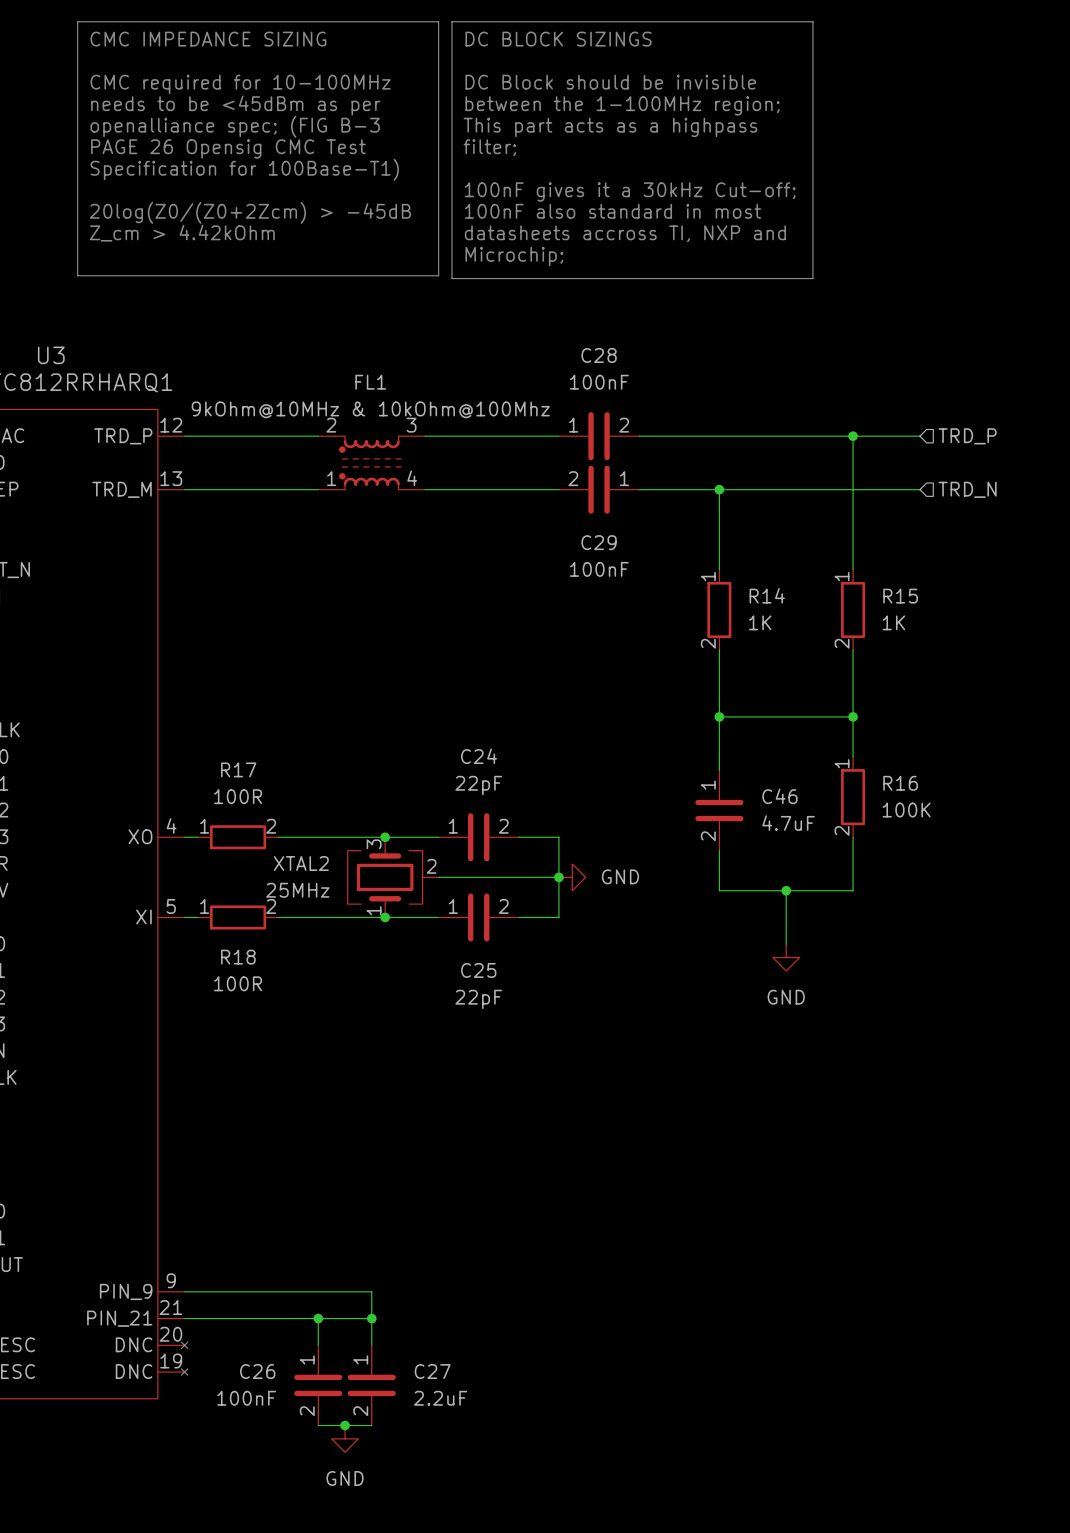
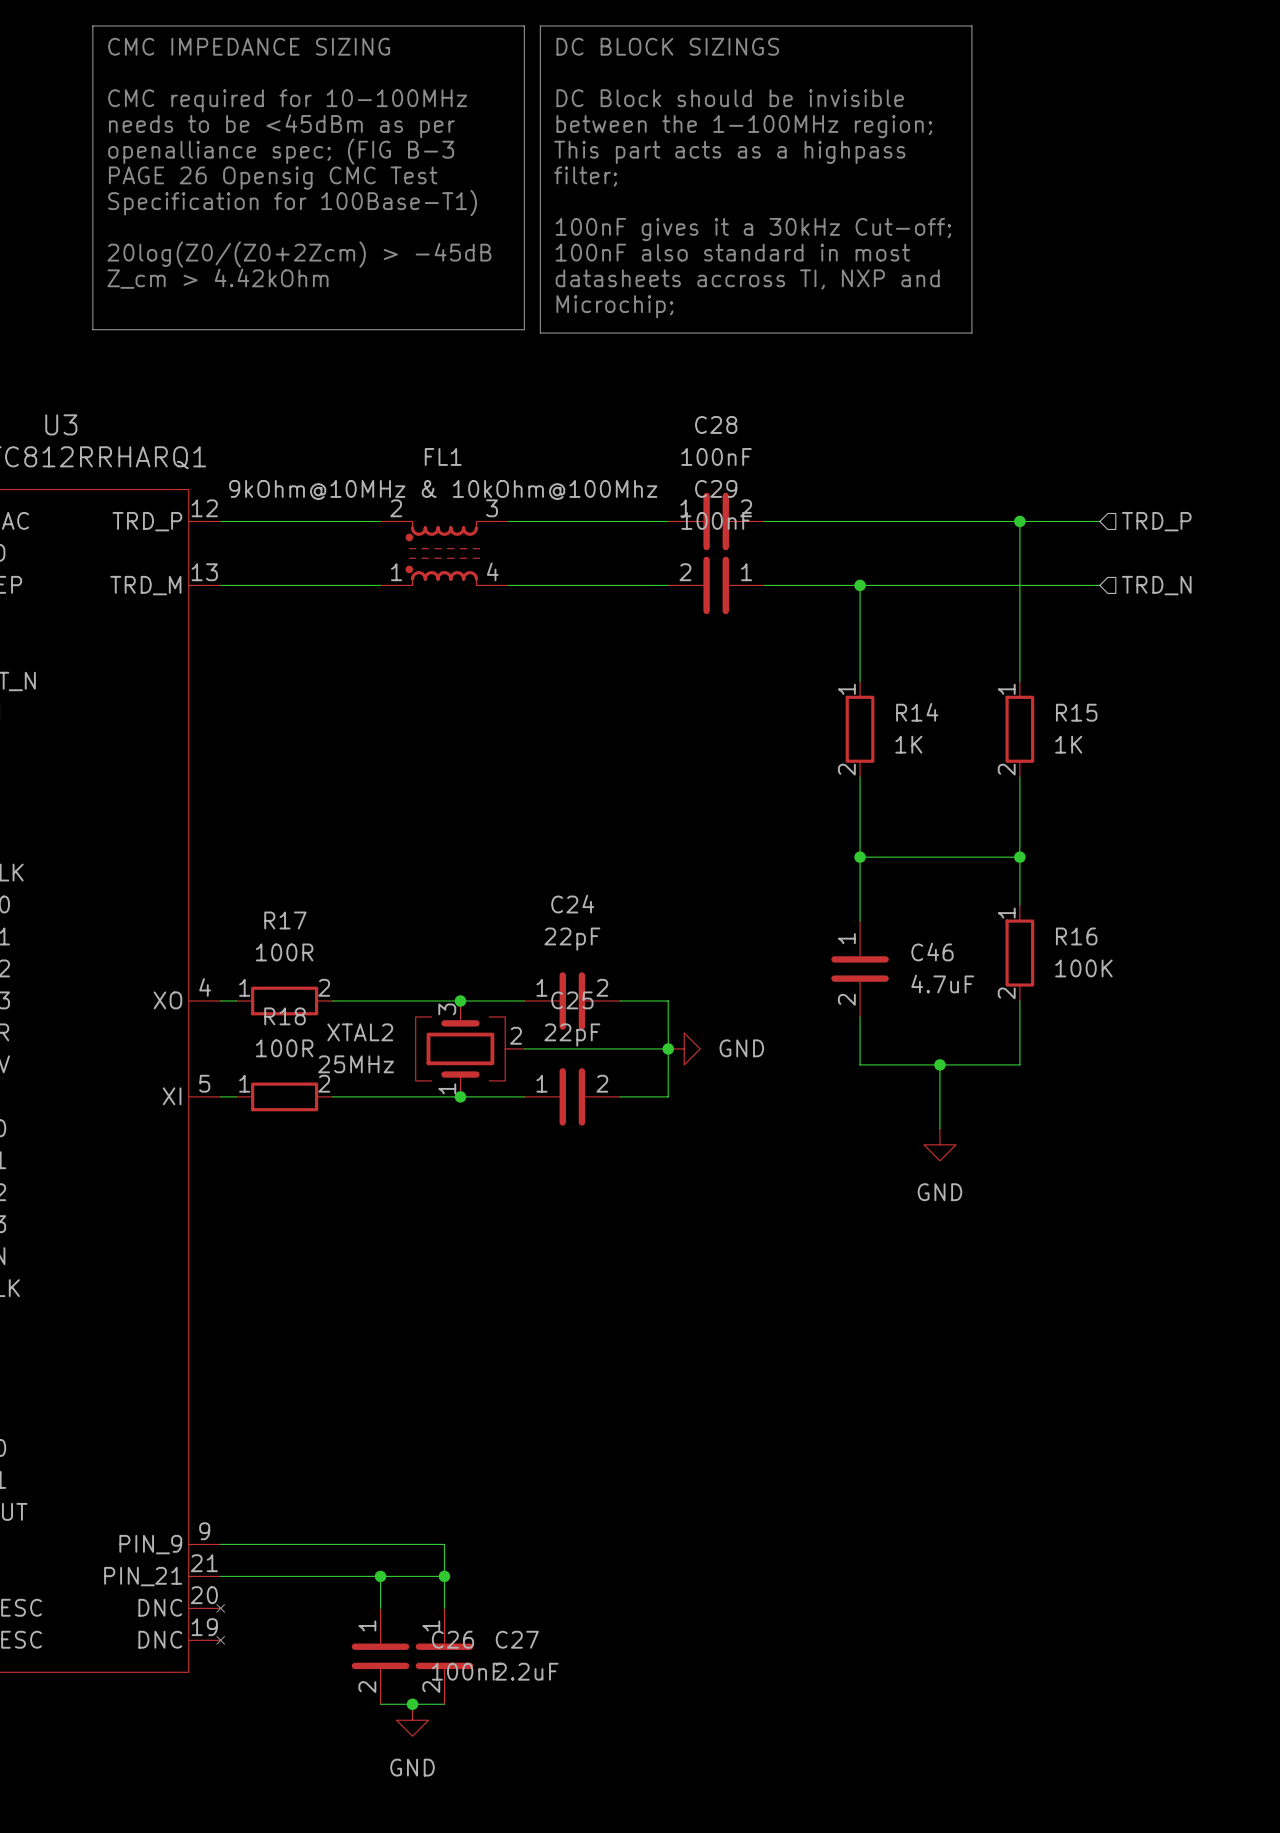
C29 name position: C29 (599, 542) -> C29 (716, 488)
C29 value position: 100nF (599, 569) -> 100nF (716, 520)
R18 name position: R18 (238, 957) -> R18 (285, 1016)
C25 name position: C25 (478, 970) -> C25 (572, 1000)
R18 value position: 100R (238, 983) -> 100R (284, 1048)
C25 value position: 22pF (478, 999) -> 22pF (572, 1035)
C26 name position: C26 (257, 1371) -> C26 (452, 1639)
C26 value position: 100nF (246, 1398) -> 100nF (467, 1671)

